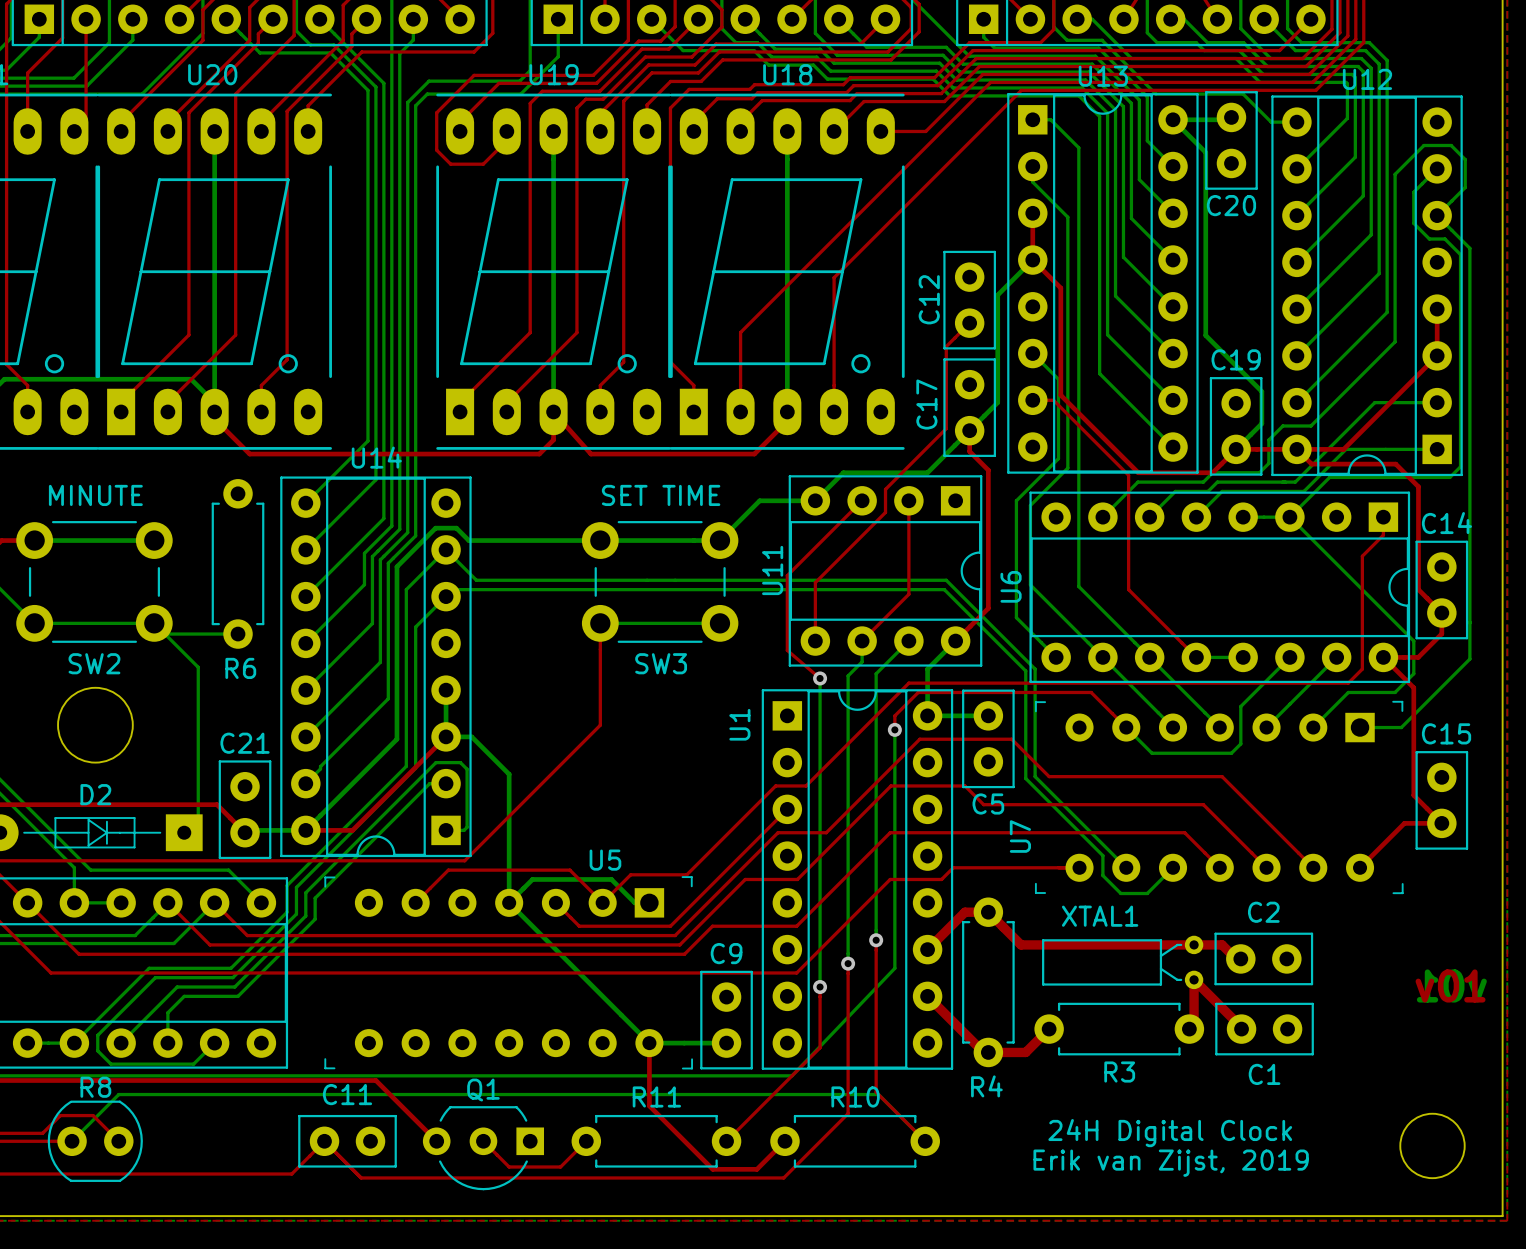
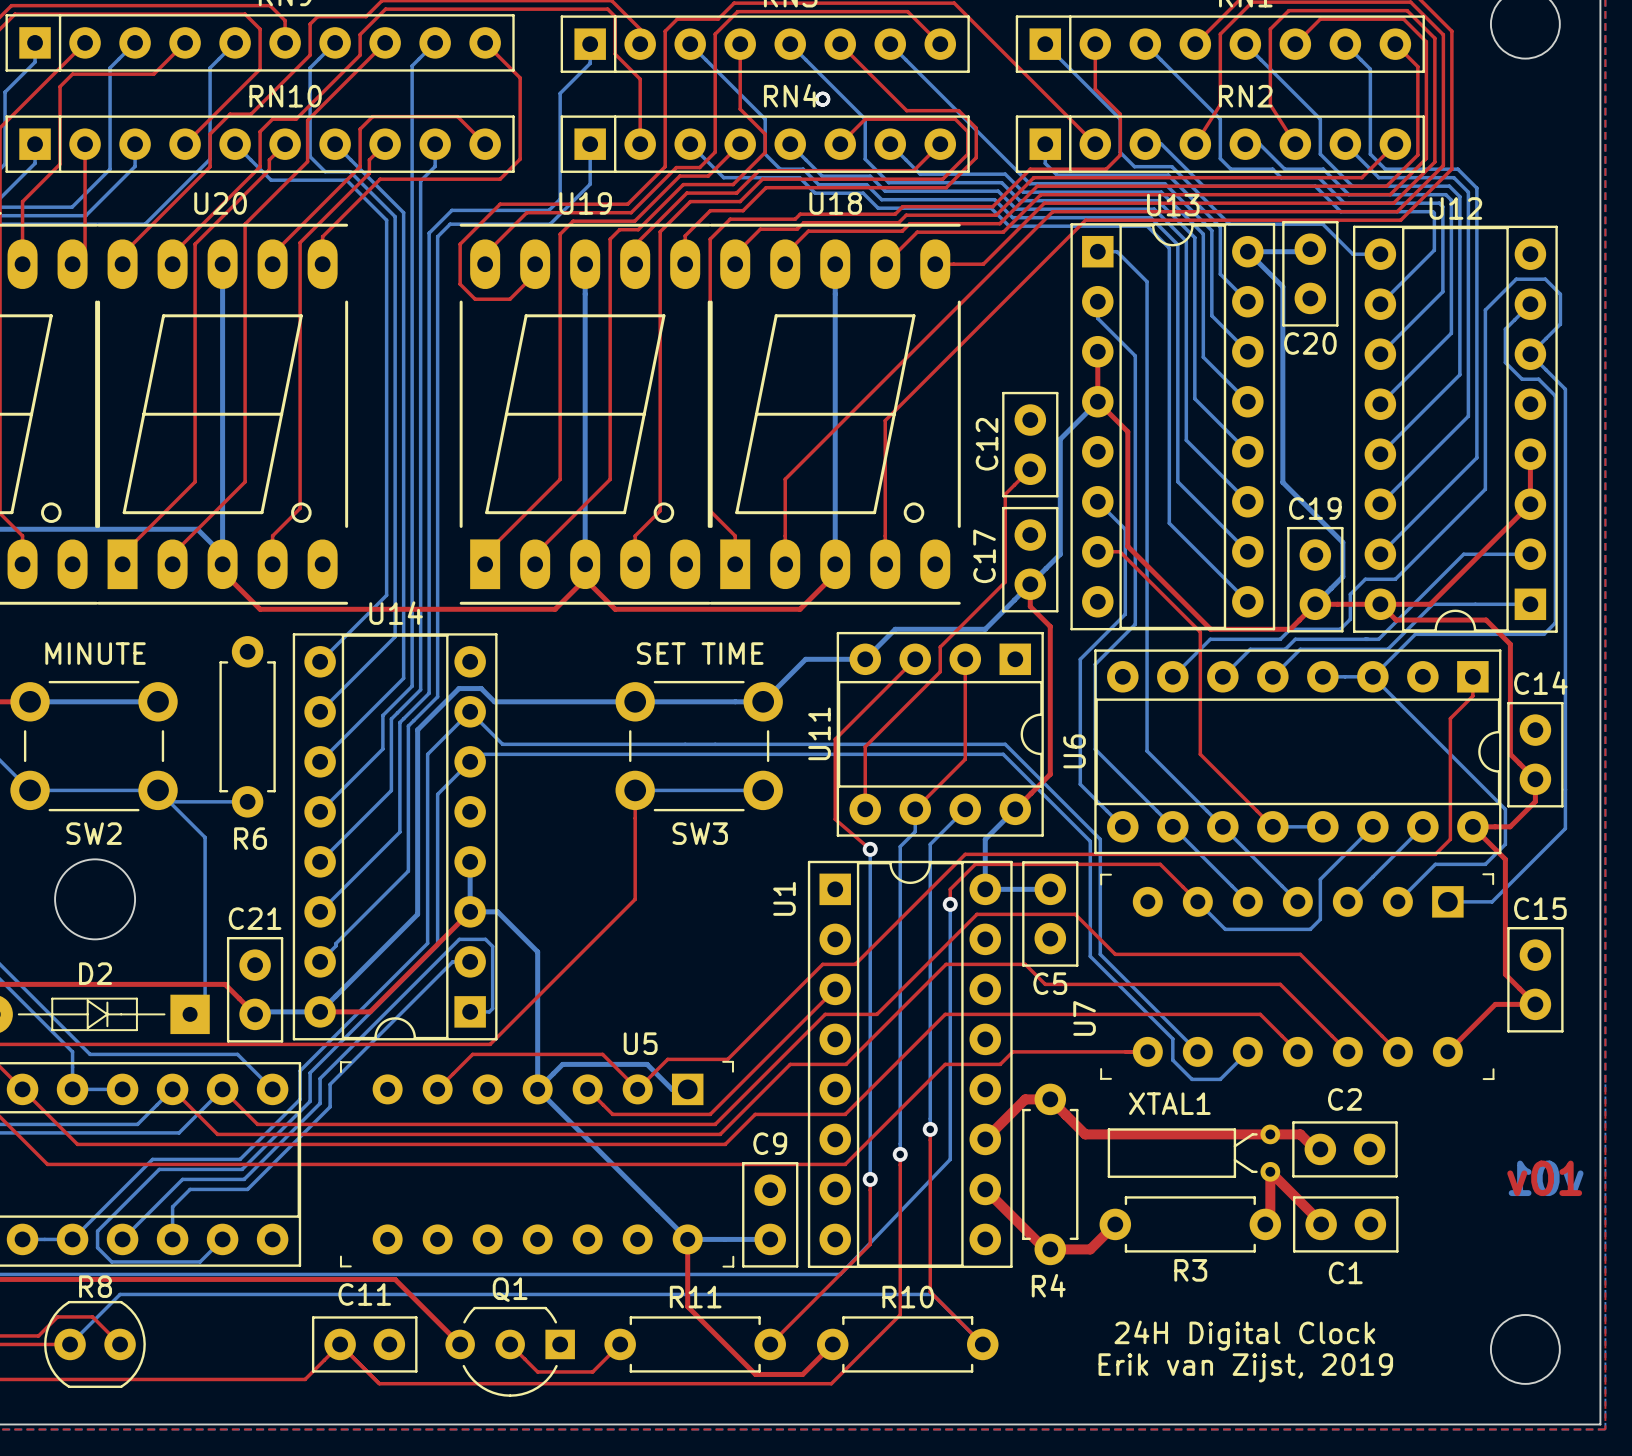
top track: (553, 411) (590, 454) -> none
top track: (553, 426) (553, 439) (539, 454) (525, 454) -> (625, 609) (615, 609) (585, 579) (555, 609)

